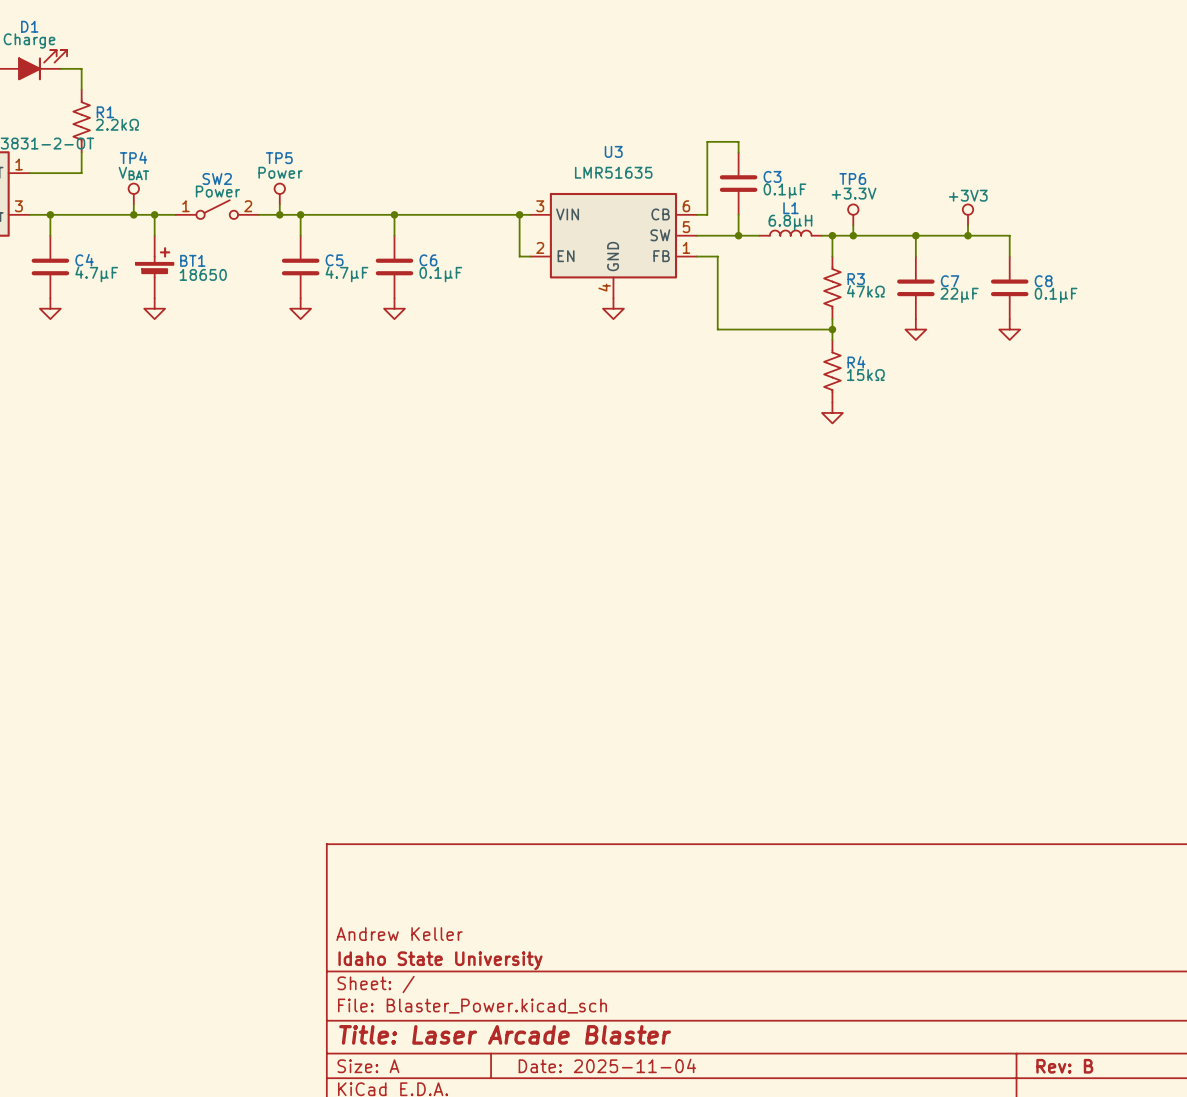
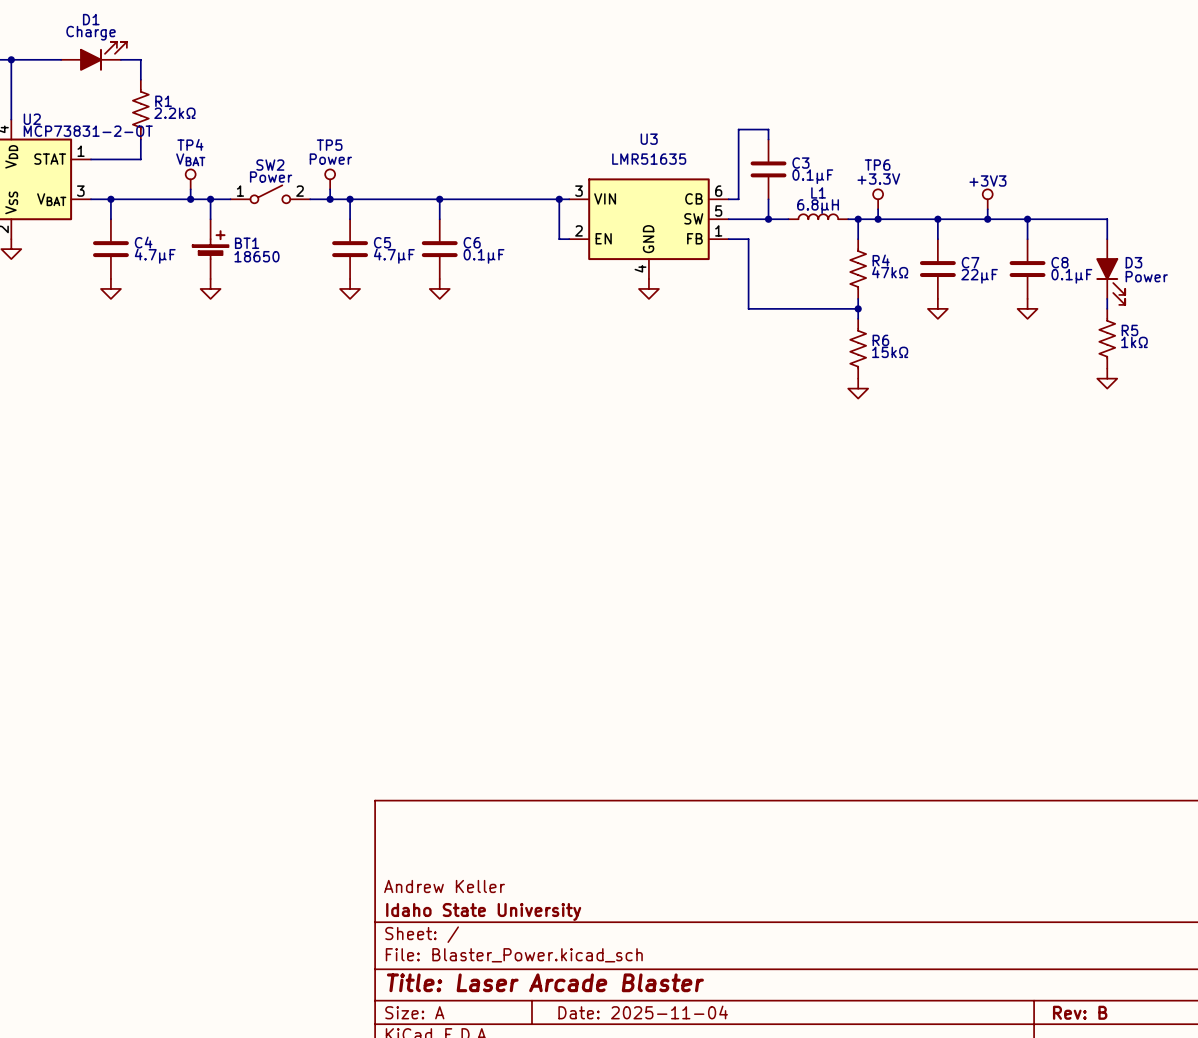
wire: none -> (1027, 219) (1107, 219) (1107, 239)
junction: none -> (1027, 219)
R3 name: R3 (856, 279) -> R4 (881, 260)
D3: none -> Power (1110, 272)
wire: none -> (1107, 298) (1107, 308)
R5: none -> 1kΩ (1107, 338)
R4 name: R4 (856, 362) -> R6 (880, 340)
power symbol: none -> (1107, 378)

